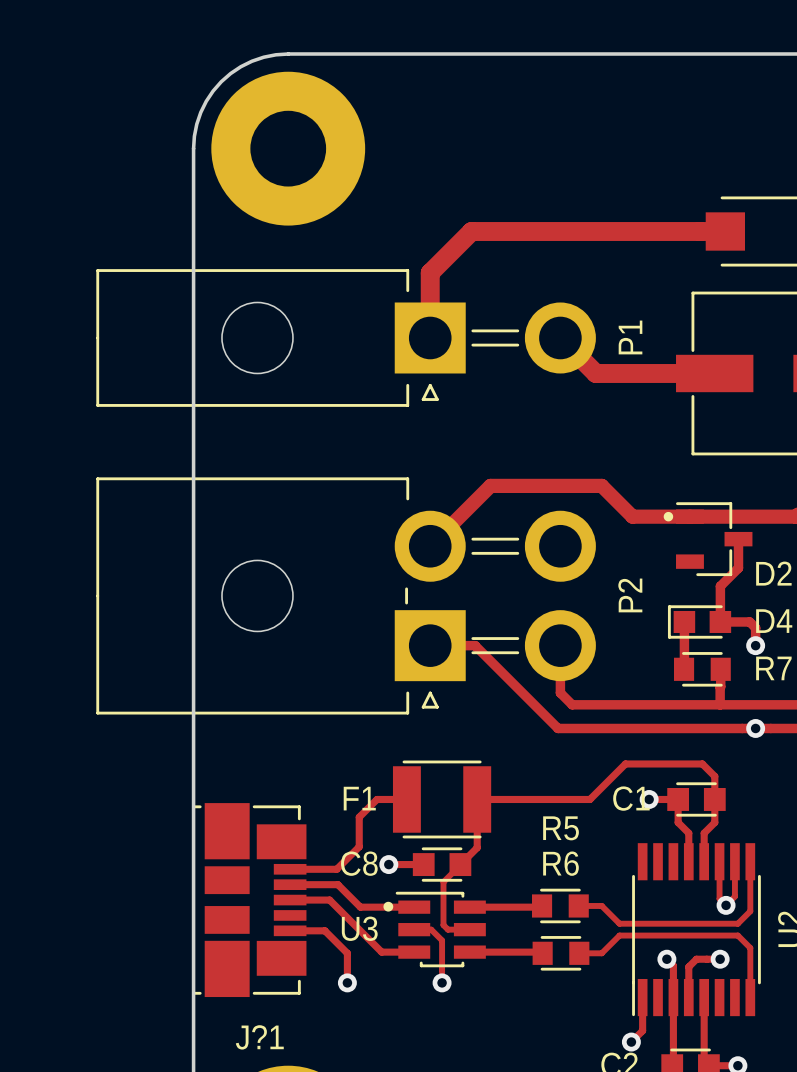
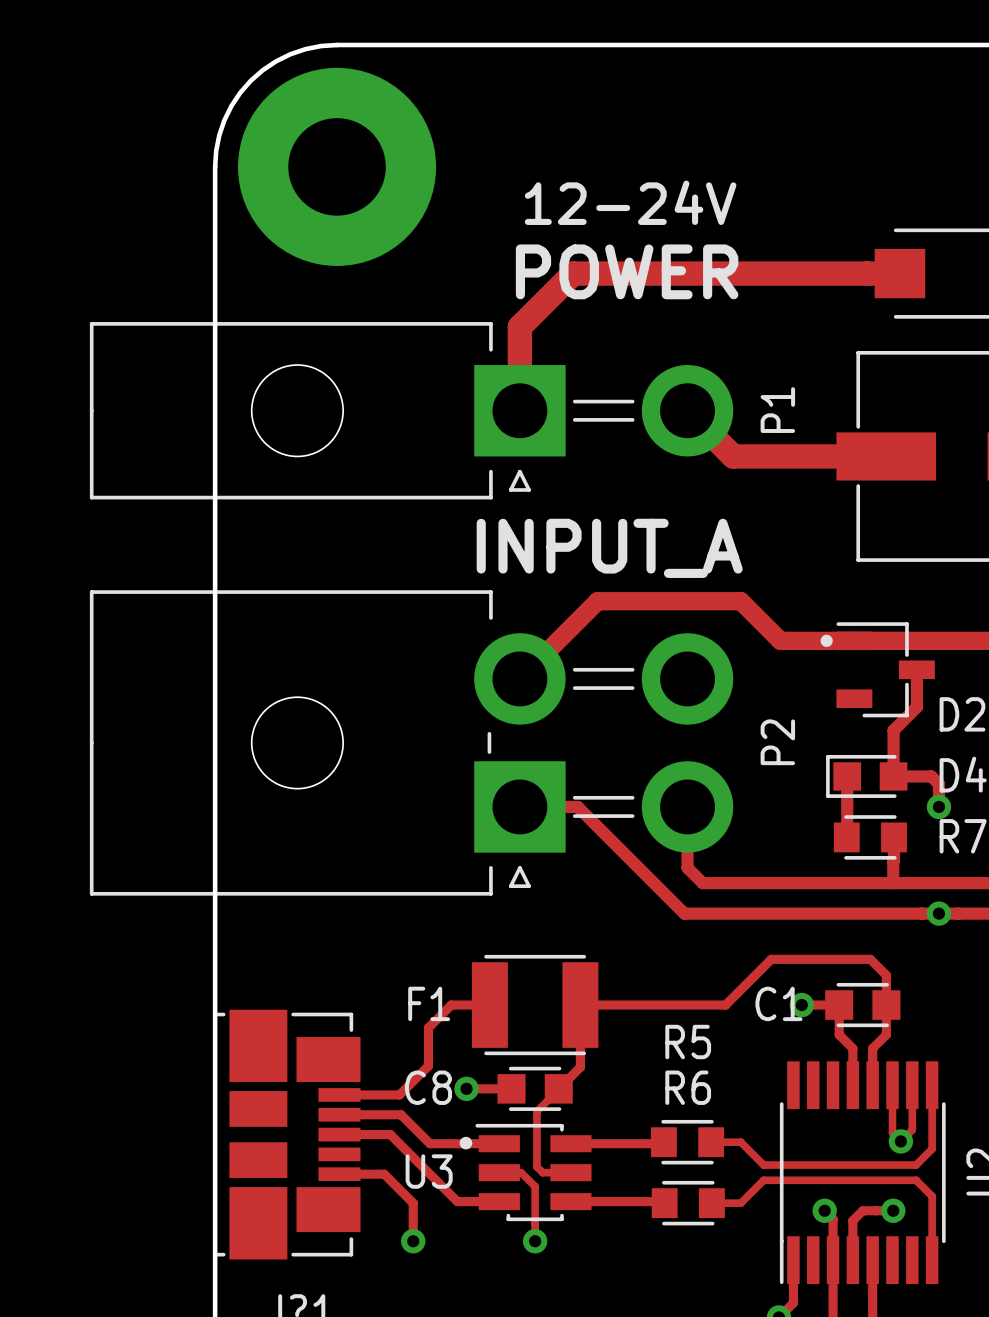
text: none -> 12-24V (630, 202)
text: none -> POWER (627, 271)
text: none -> INPUT_A (609, 548)

